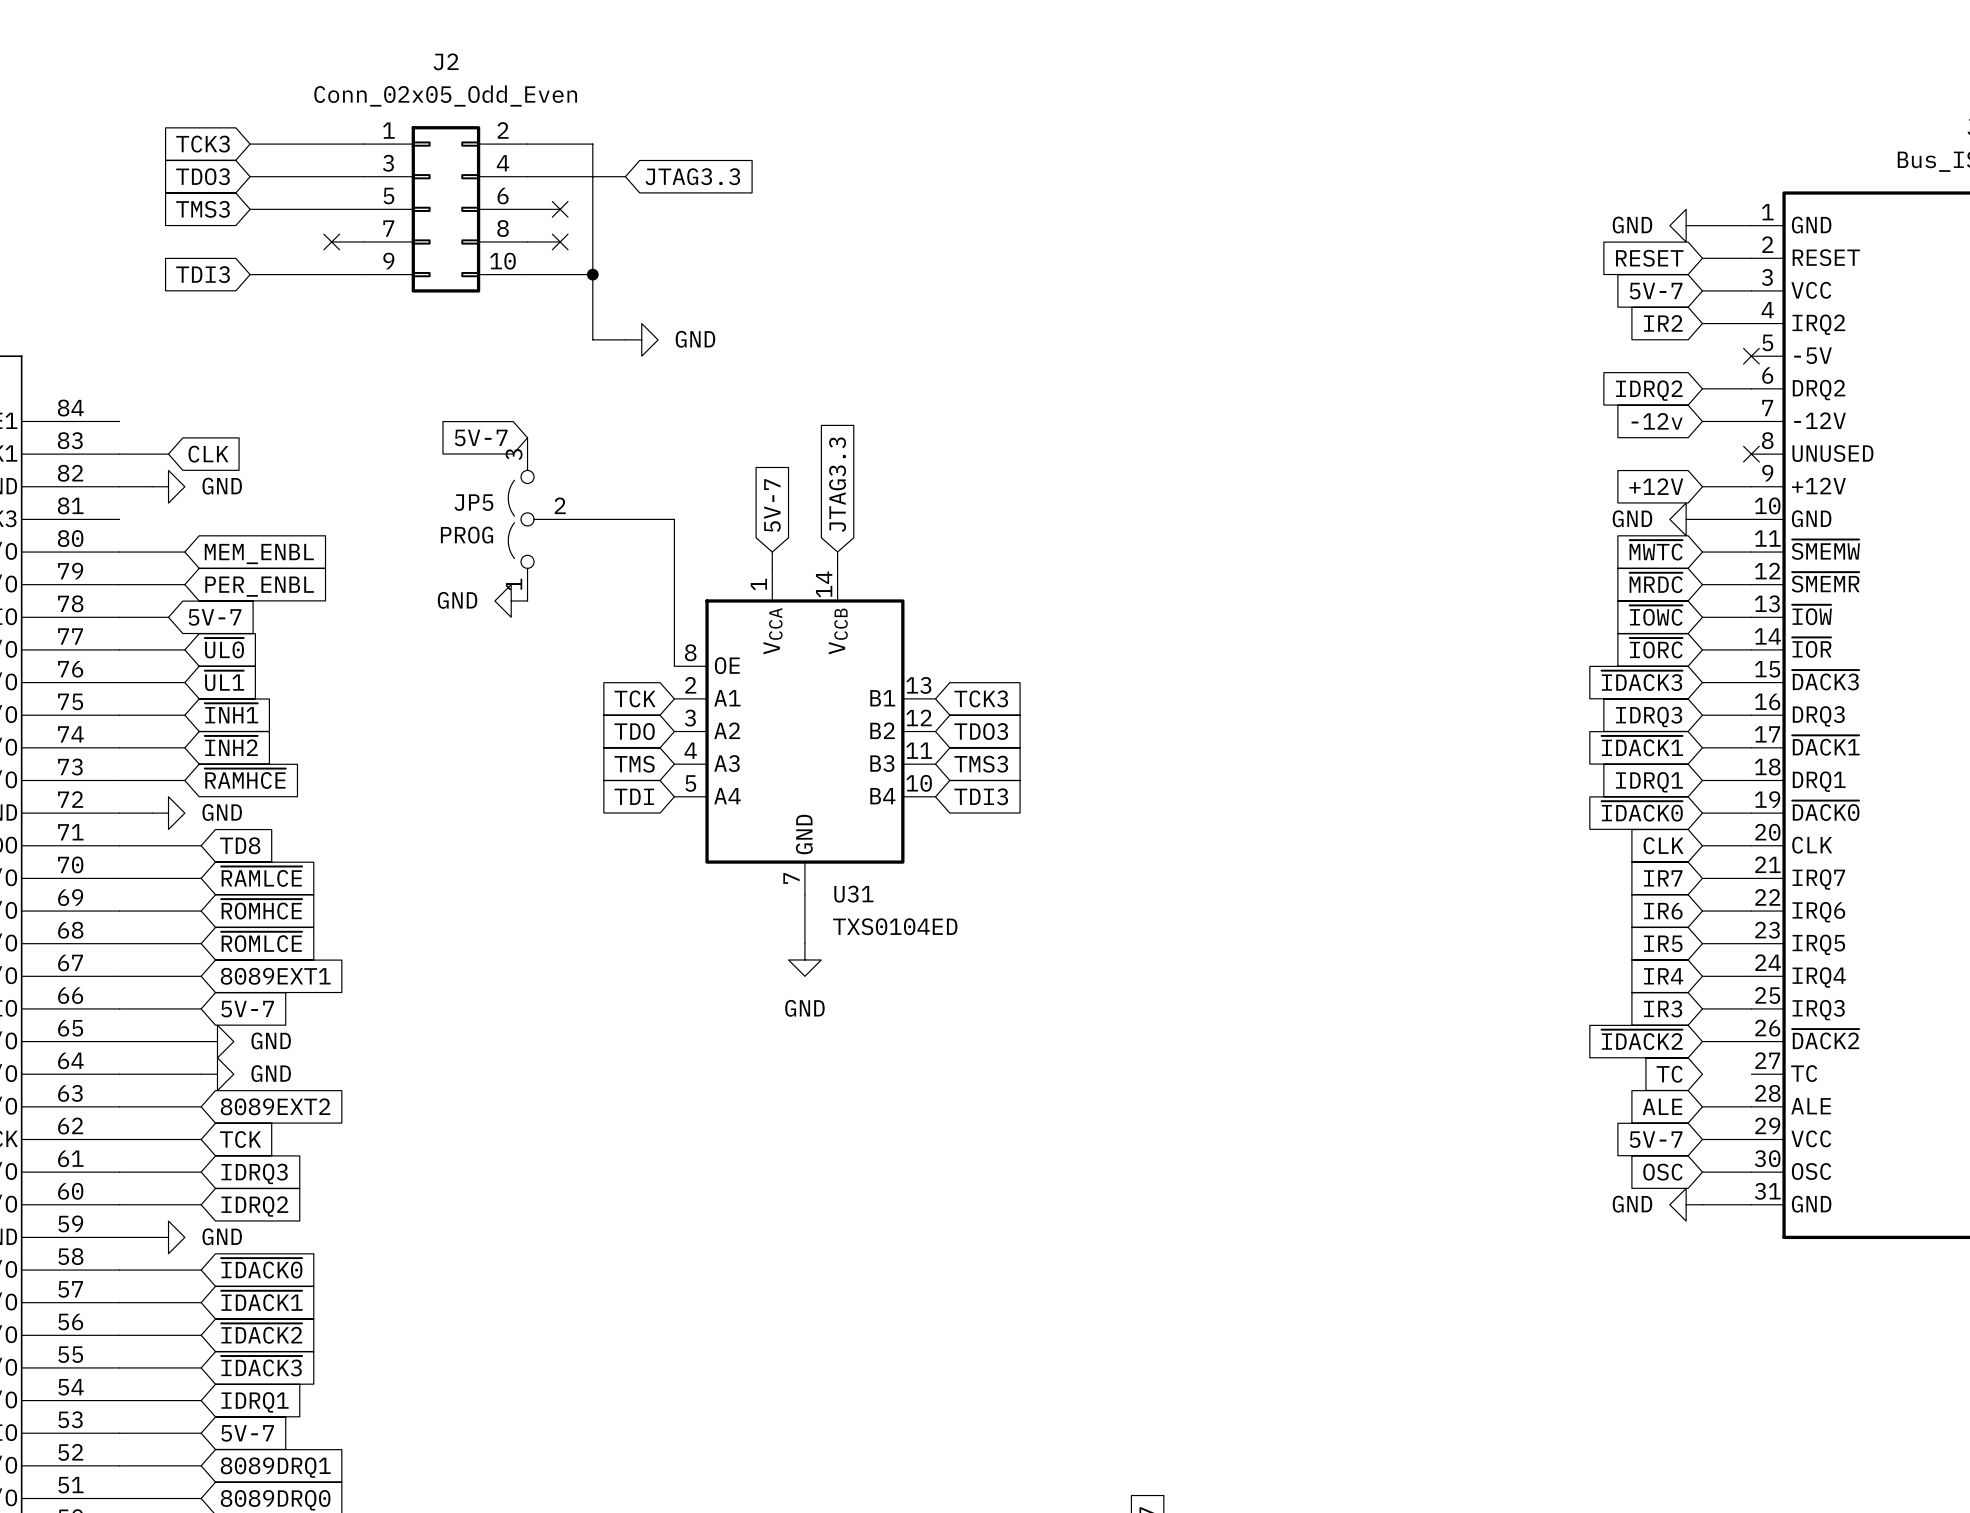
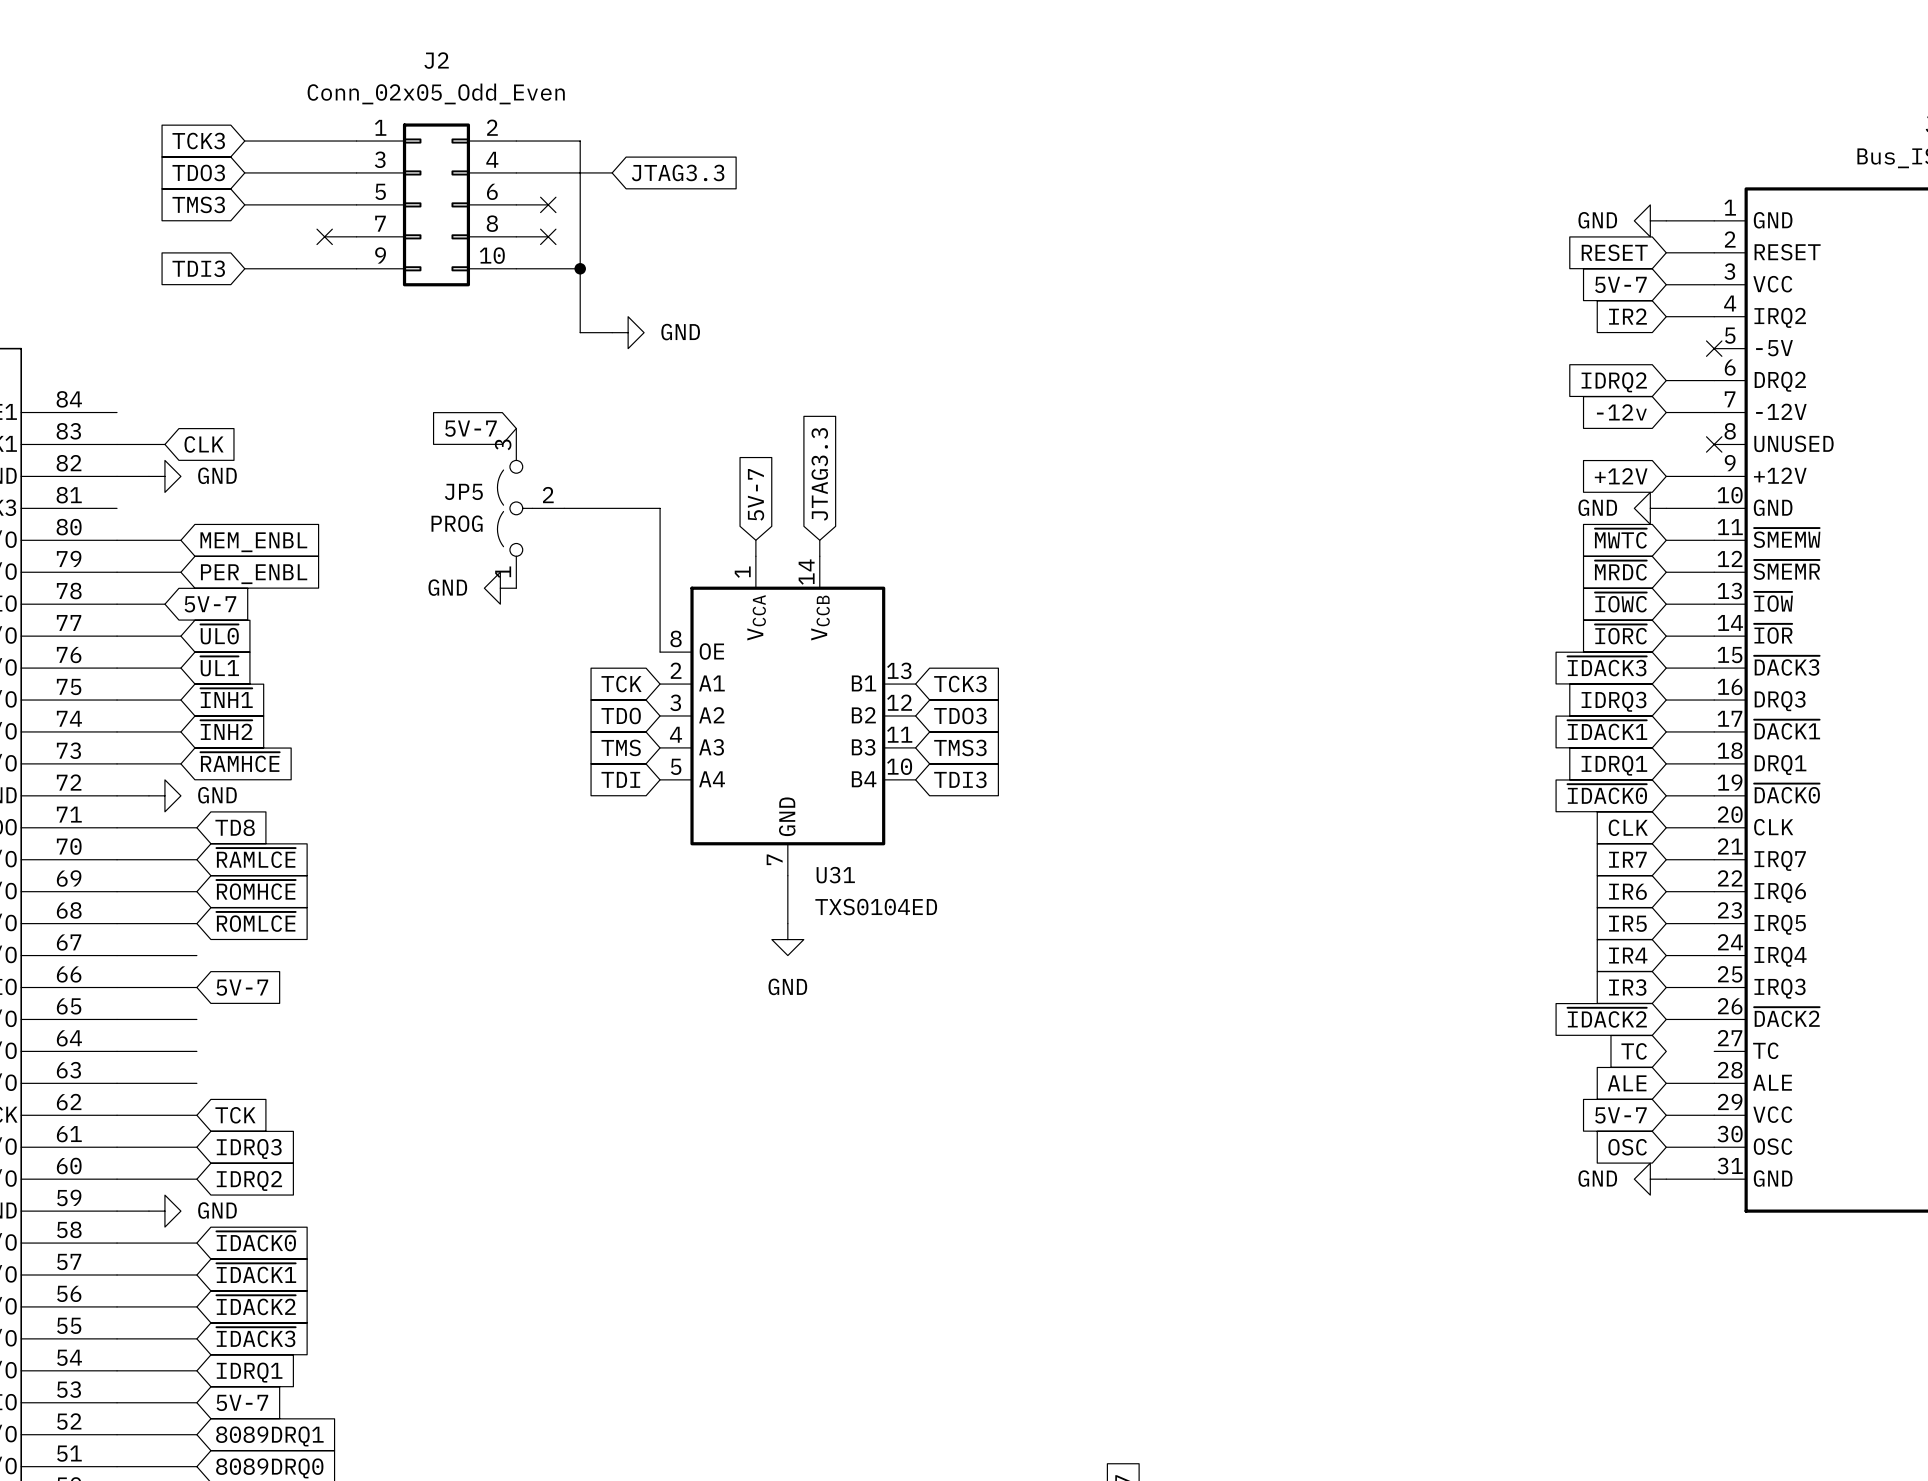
global label: 8089EXT1 (275, 976) -> none
power symbol: GND (217, 1041) -> none
power symbol: GND (217, 1074) -> none
global label: 8089EXT2 (275, 1106) -> none

